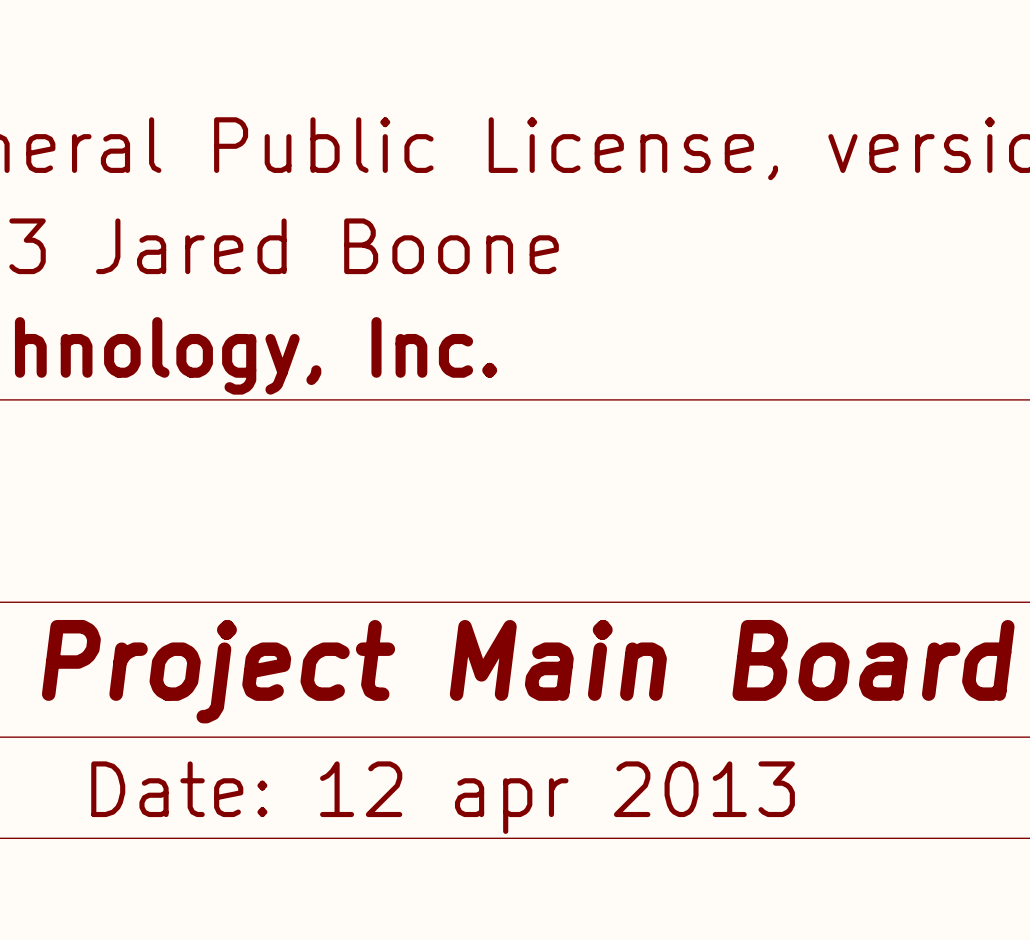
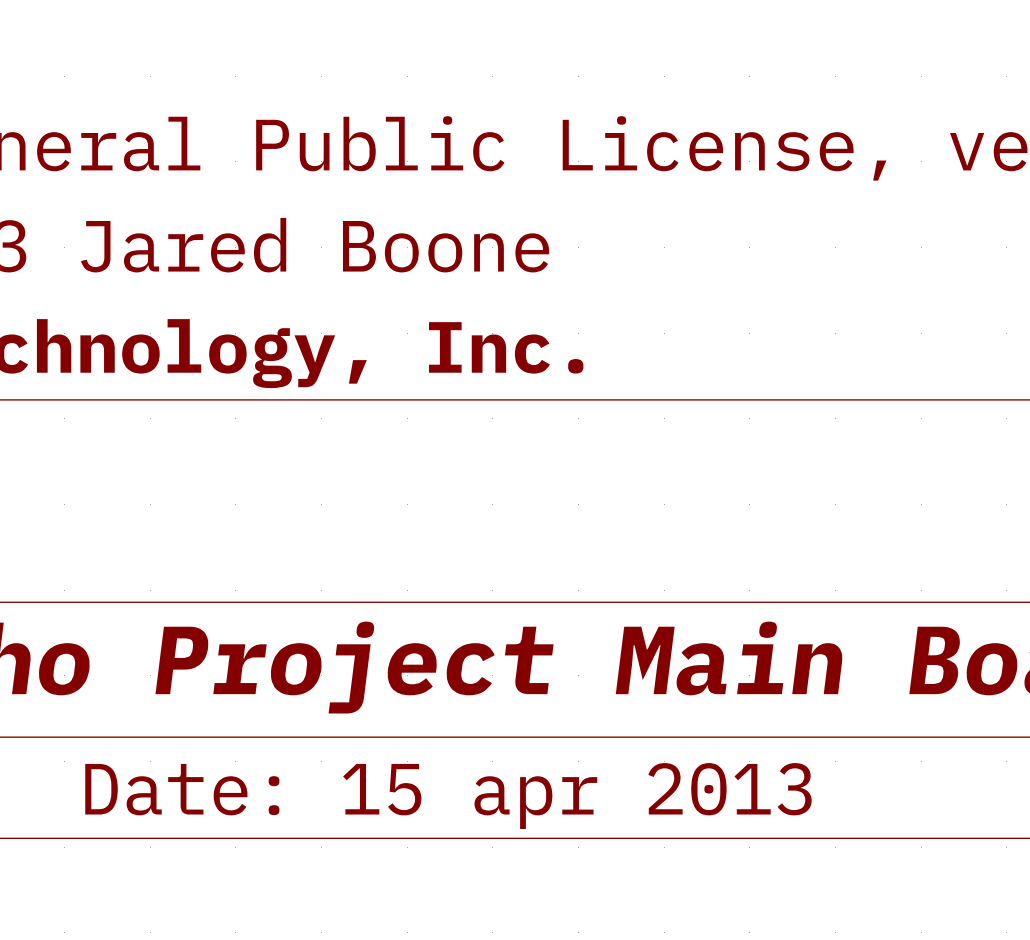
title block: Date: 12 apr 2013 (443, 797) -> Date: 15 apr 2013 (448, 796)

